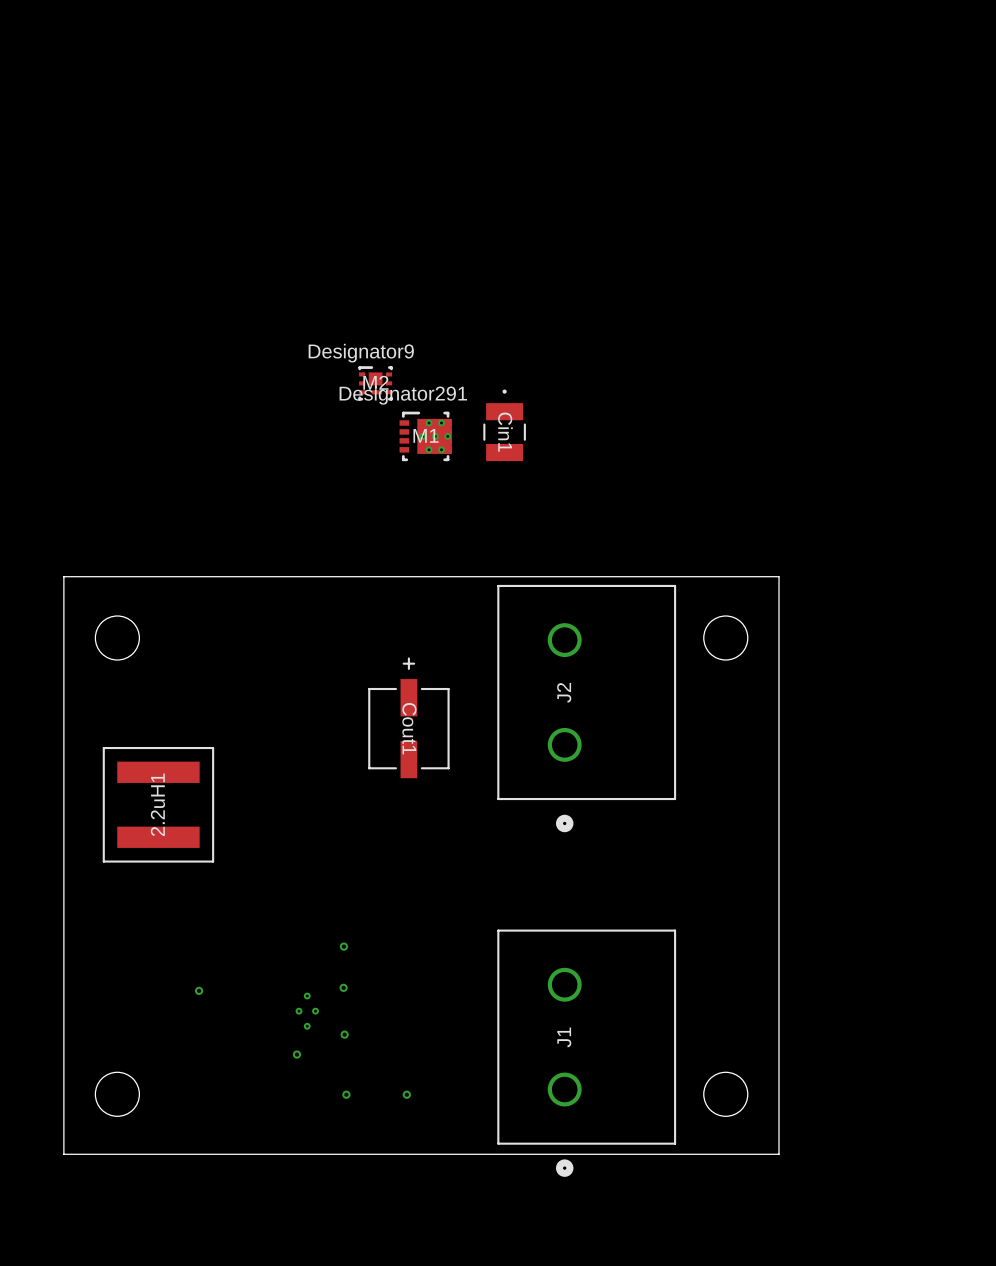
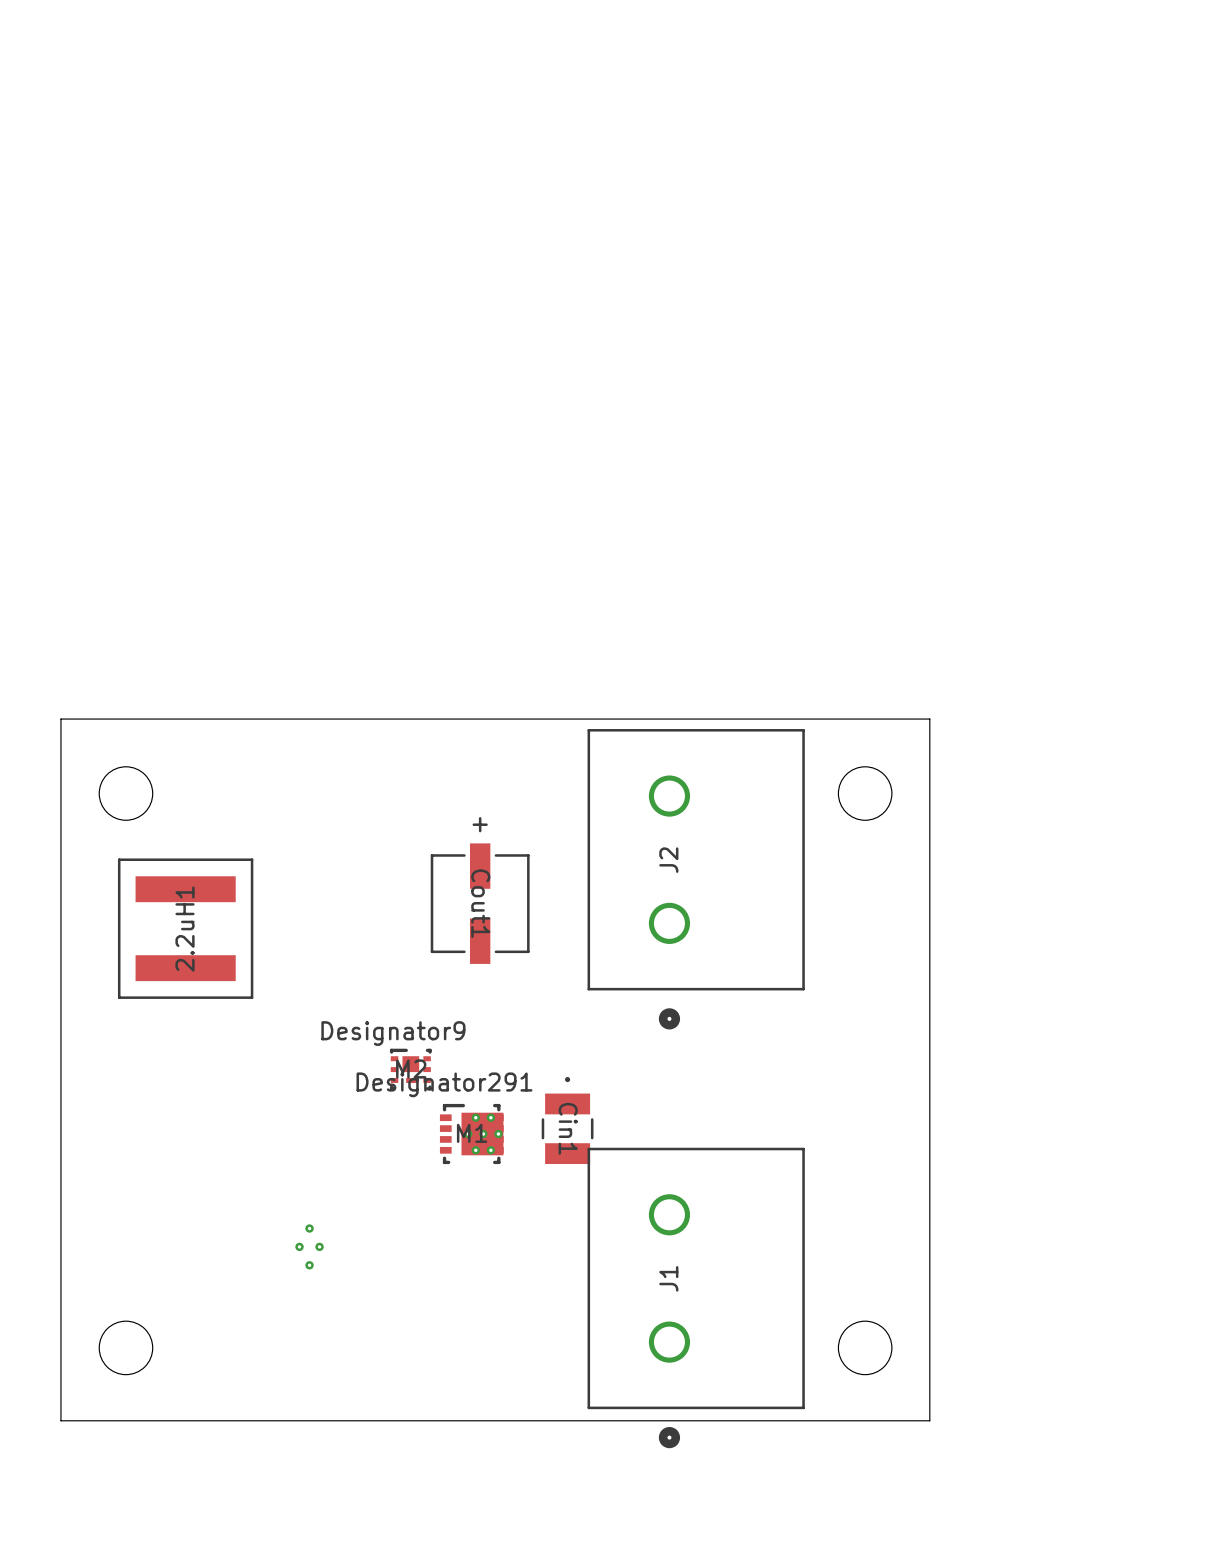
M2 position: (375, 383) -> (410, 1069)
Cin1 position: (504, 425) -> (567, 1120)
M1 position: (425, 436) -> (471, 1134)
2.2uH1 position: (158, 804) -> (185, 928)
via: (343, 946) -> none
via: (343, 987) -> none
via: (199, 990) -> none
part position: (307, 1011) -> (309, 1246)
via: (344, 1034) -> none
via: (296, 1054) -> none
via: (346, 1094) -> none
via: (406, 1094) -> none

